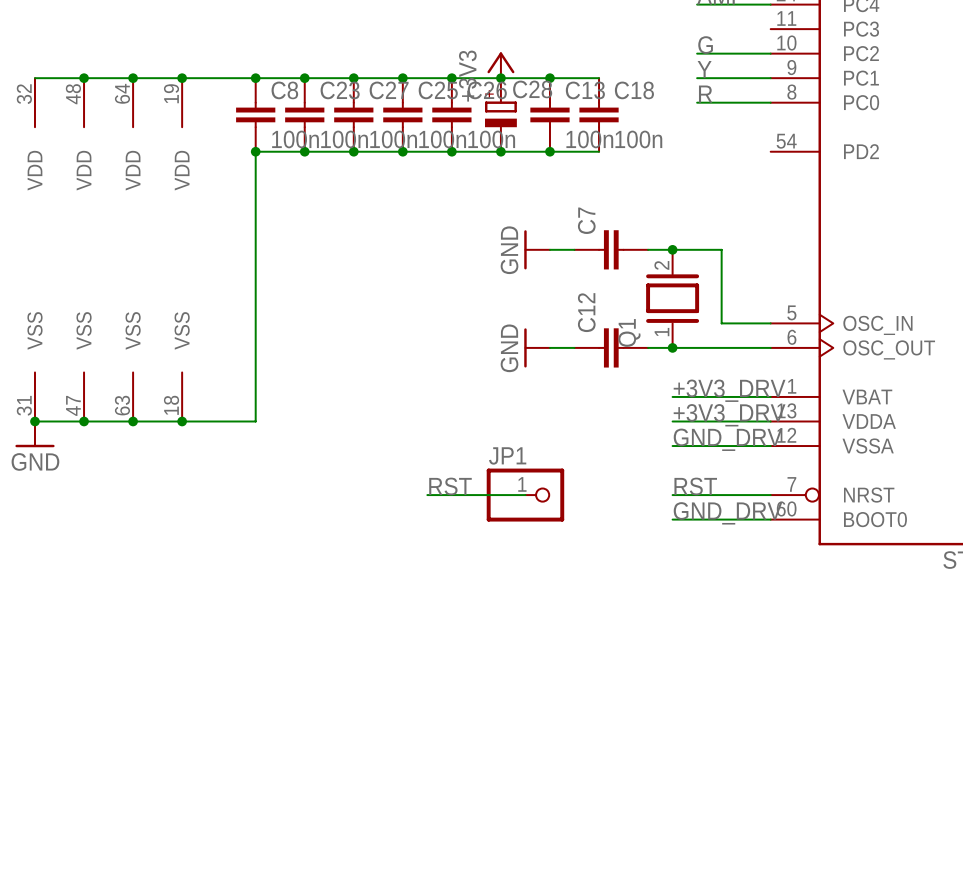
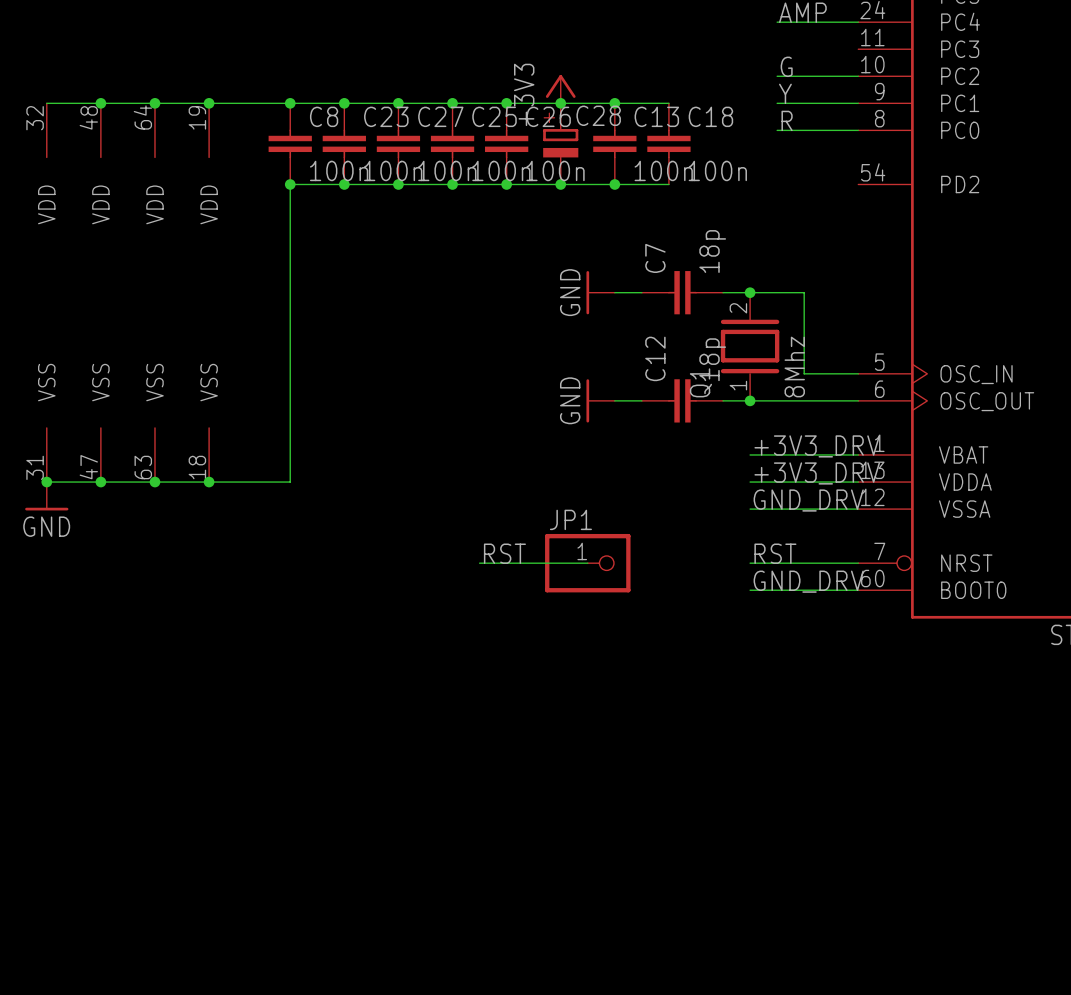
C7 value: none -> 18p (712, 251)
C12 value: none -> 18p (712, 359)
Q1 value: none -> 8Mhz (794, 367)

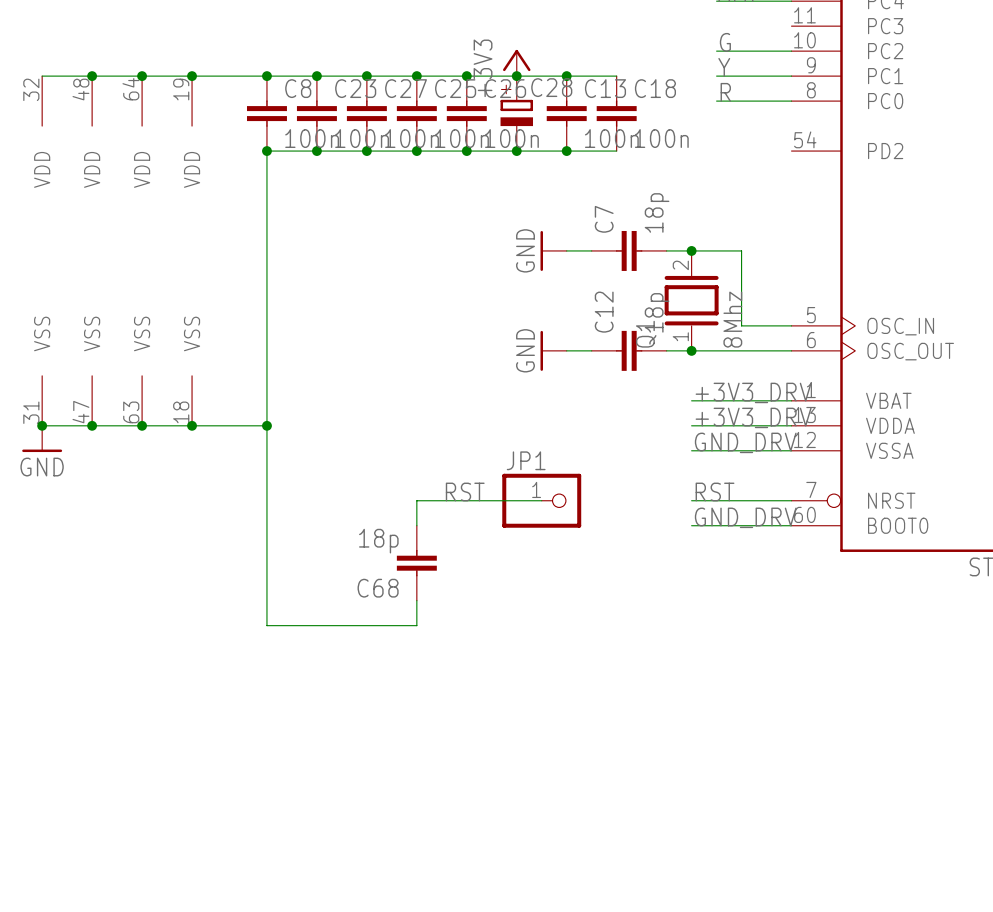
wire: none -> (266, 425) (266, 625) (416, 625) (416, 600)
junction: none -> (266, 425)
wire: none -> (441, 500) (416, 500) (416, 525)
C68: none -> 18p (416, 563)

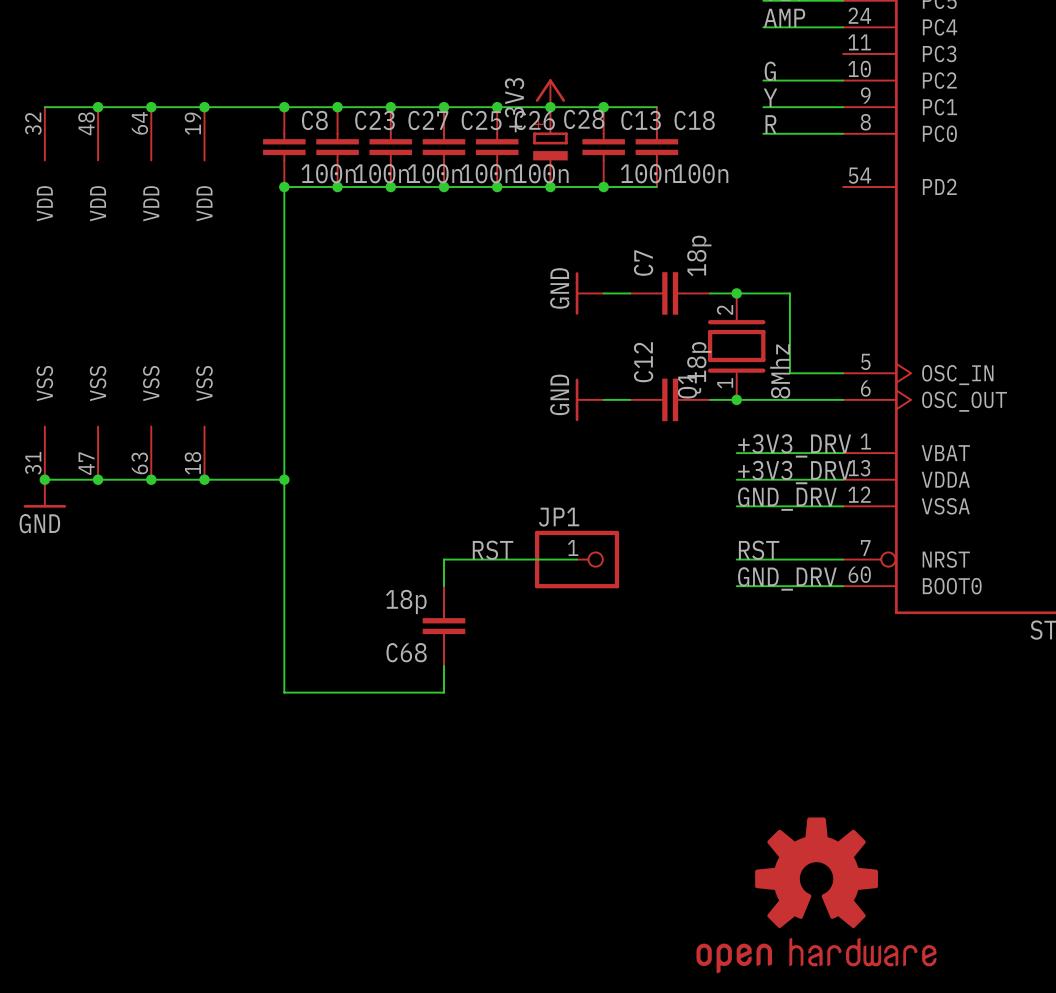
part: none -> (816, 895)

